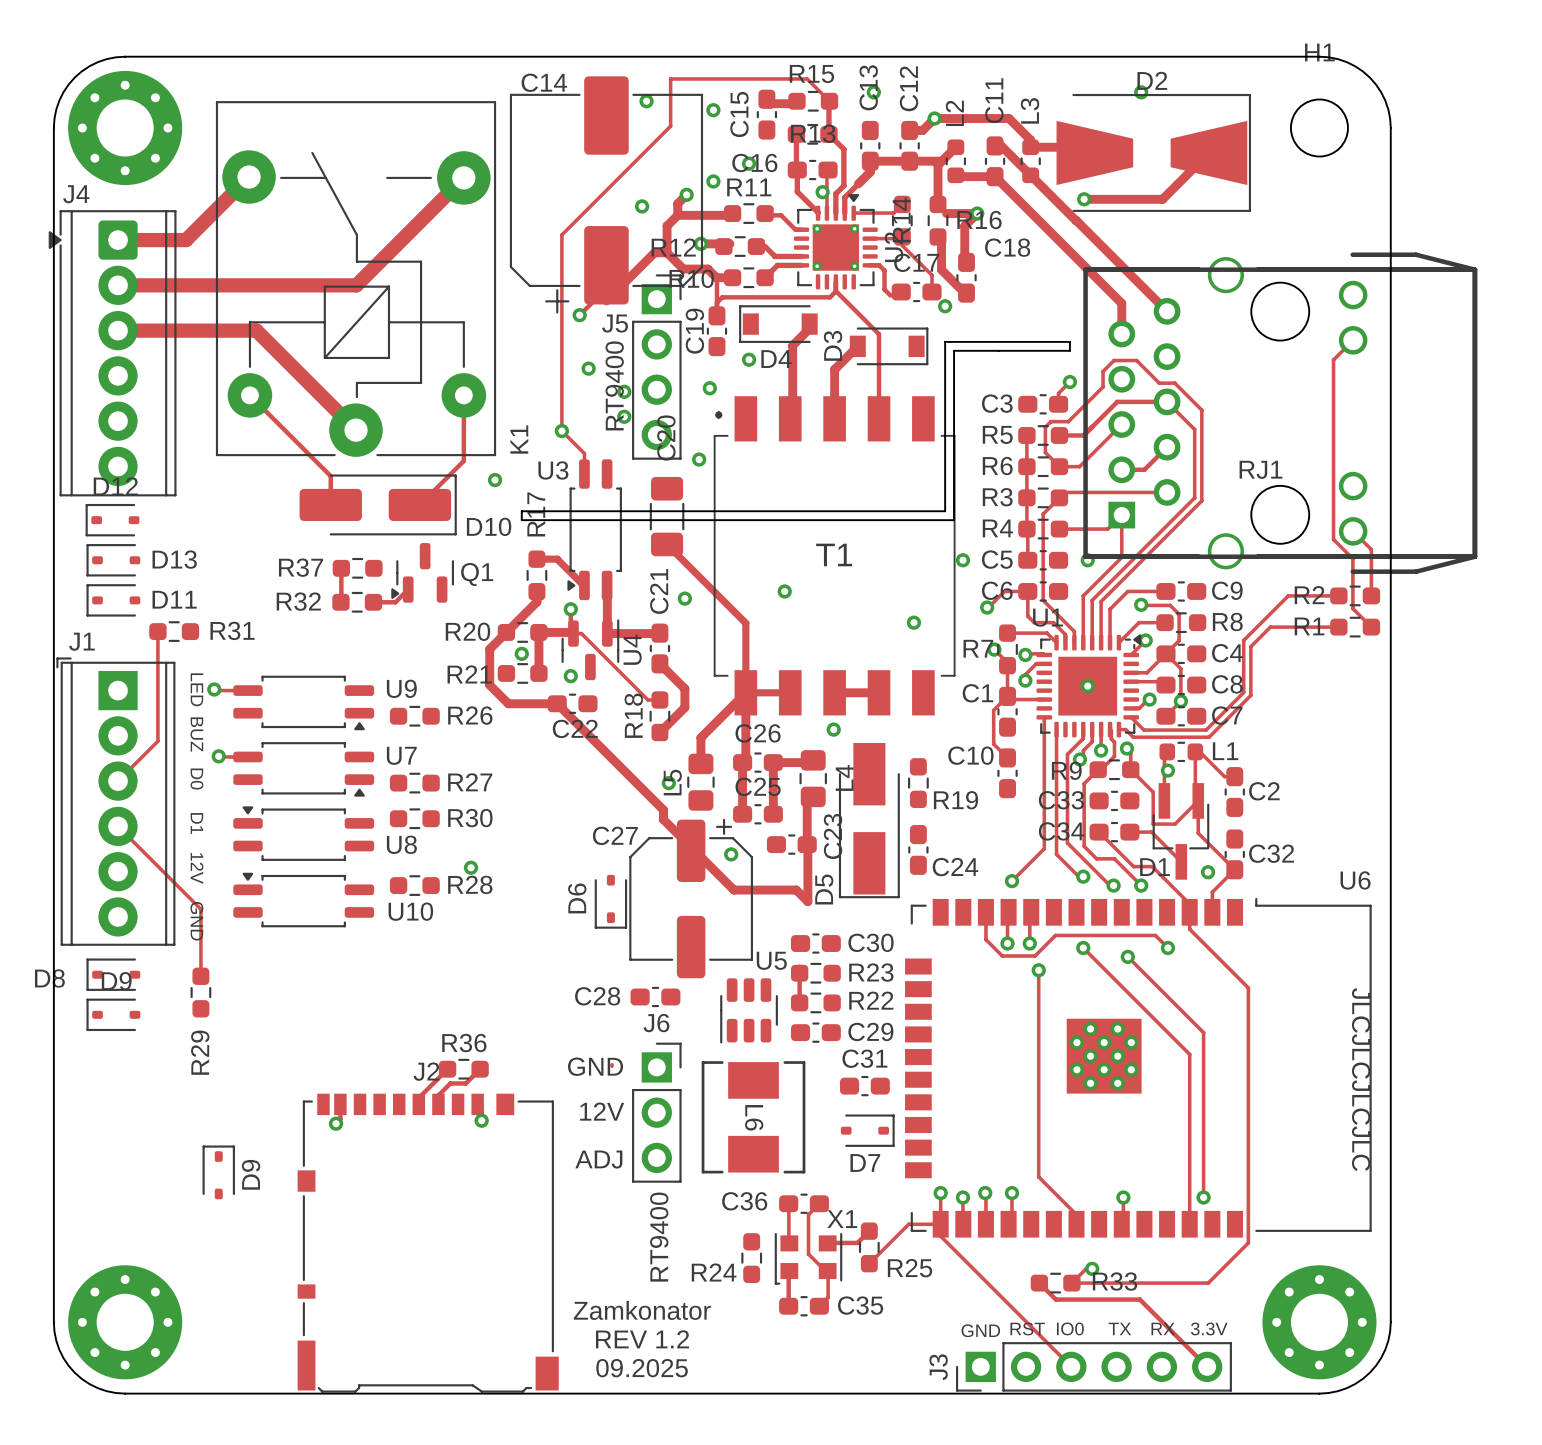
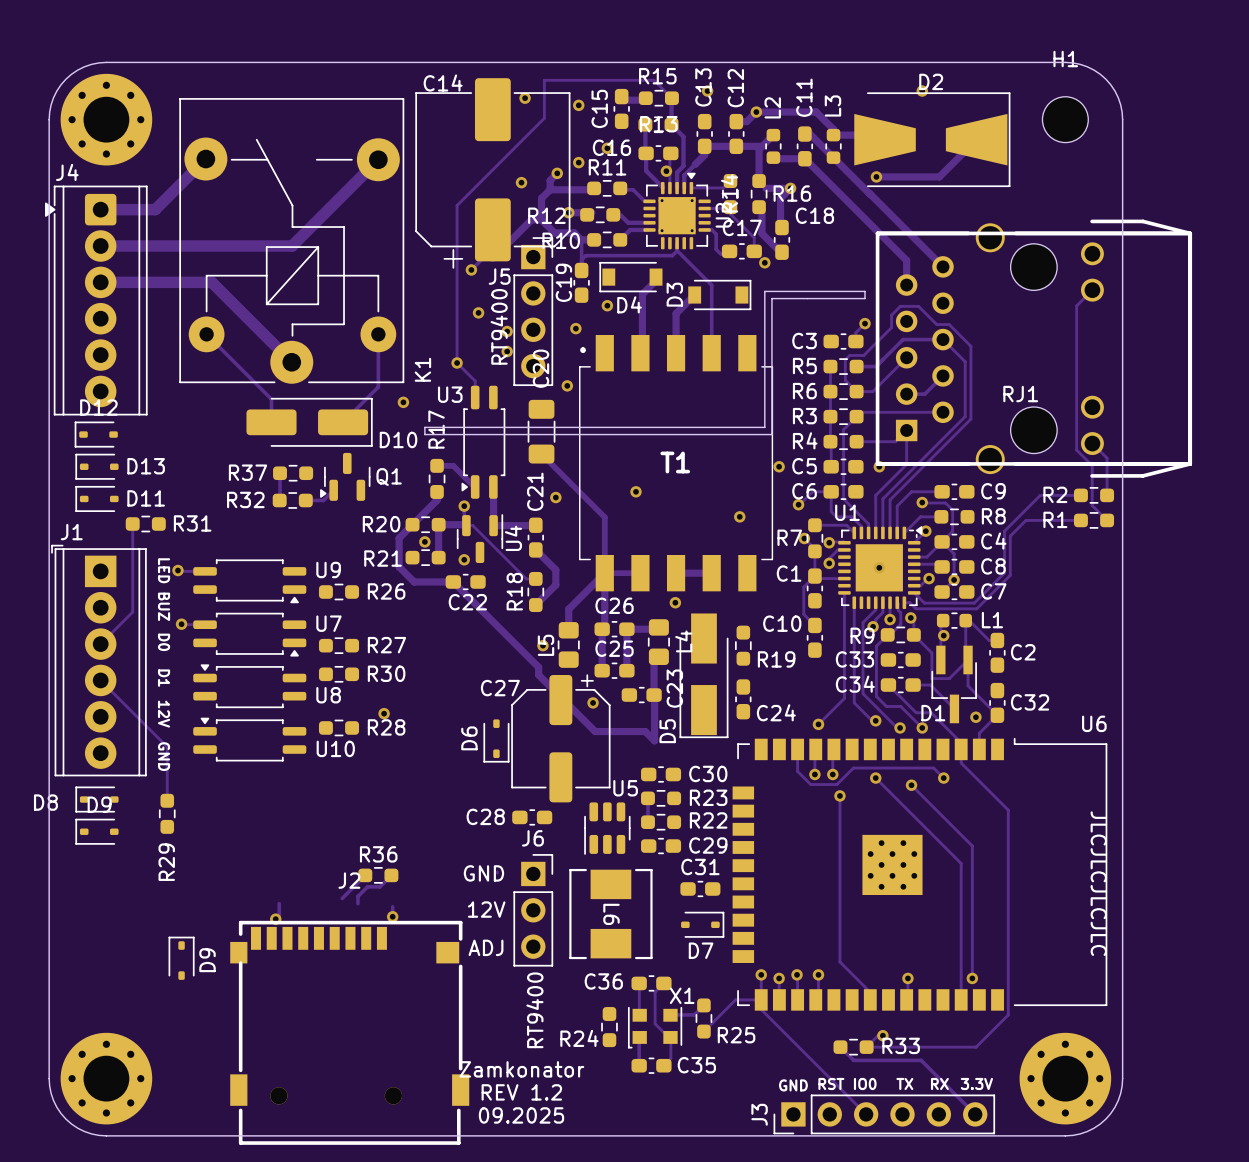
J2 footprint: [297, 1093, 559, 1393] -> [230, 920, 470, 1145]

